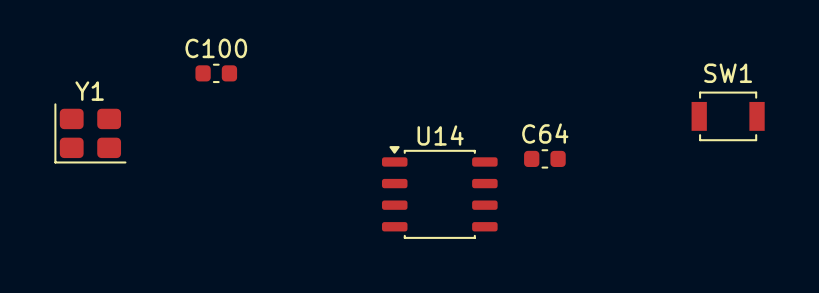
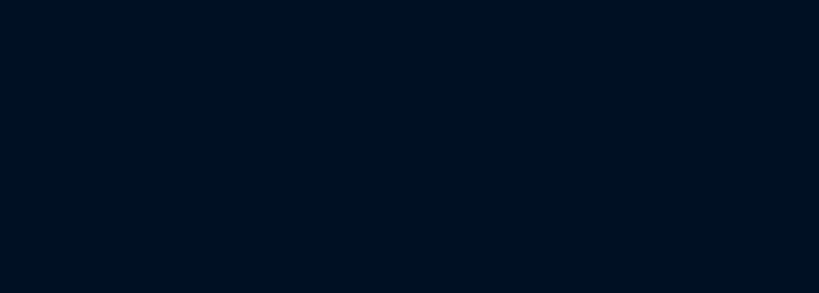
C100: (216, 73) -> none
SW1: (728, 116) -> none
Y1: (90, 133) -> none
C64: (544, 158) -> none
U14: (439, 192) -> none

